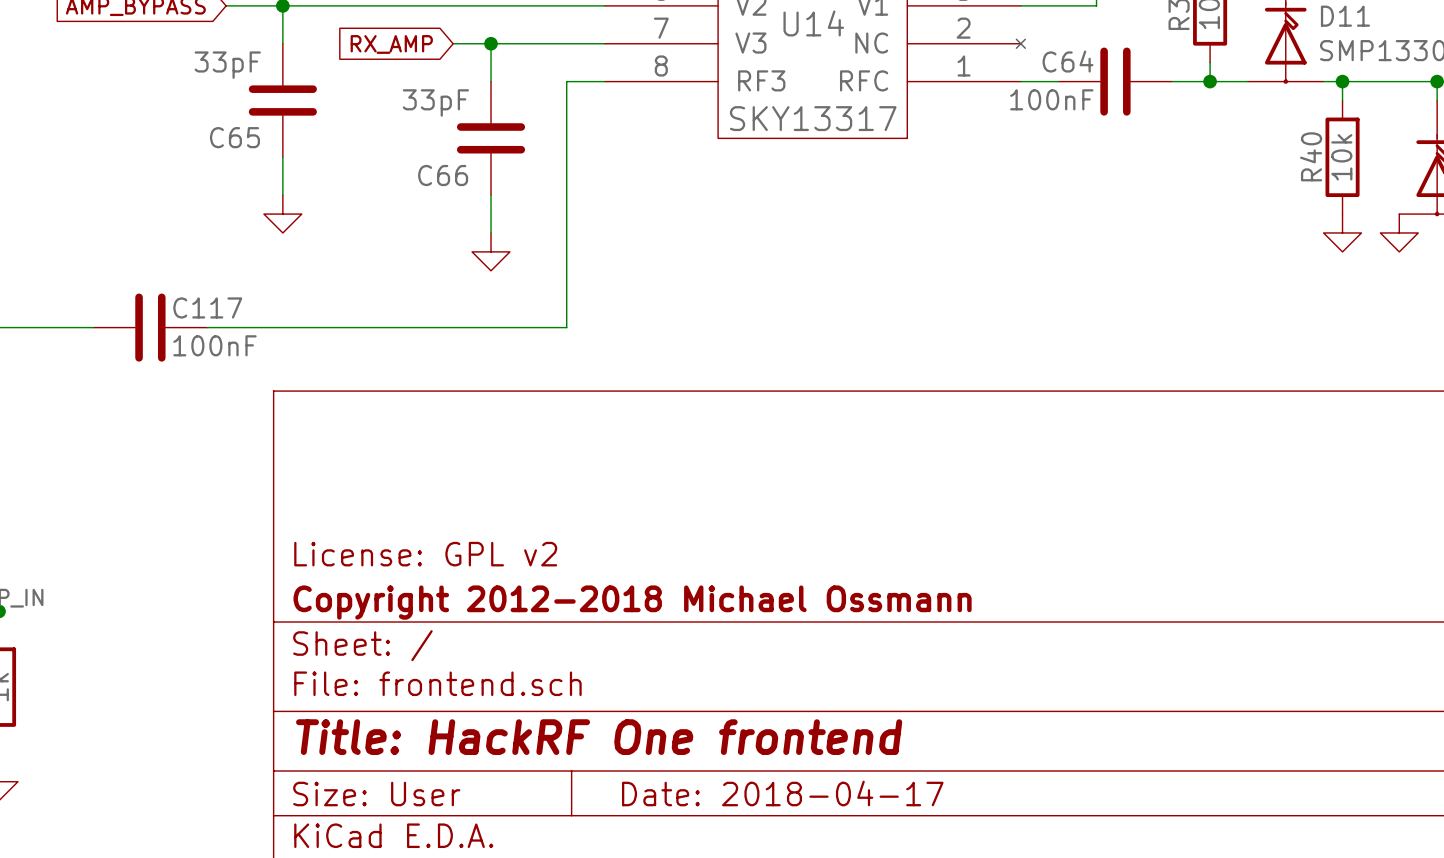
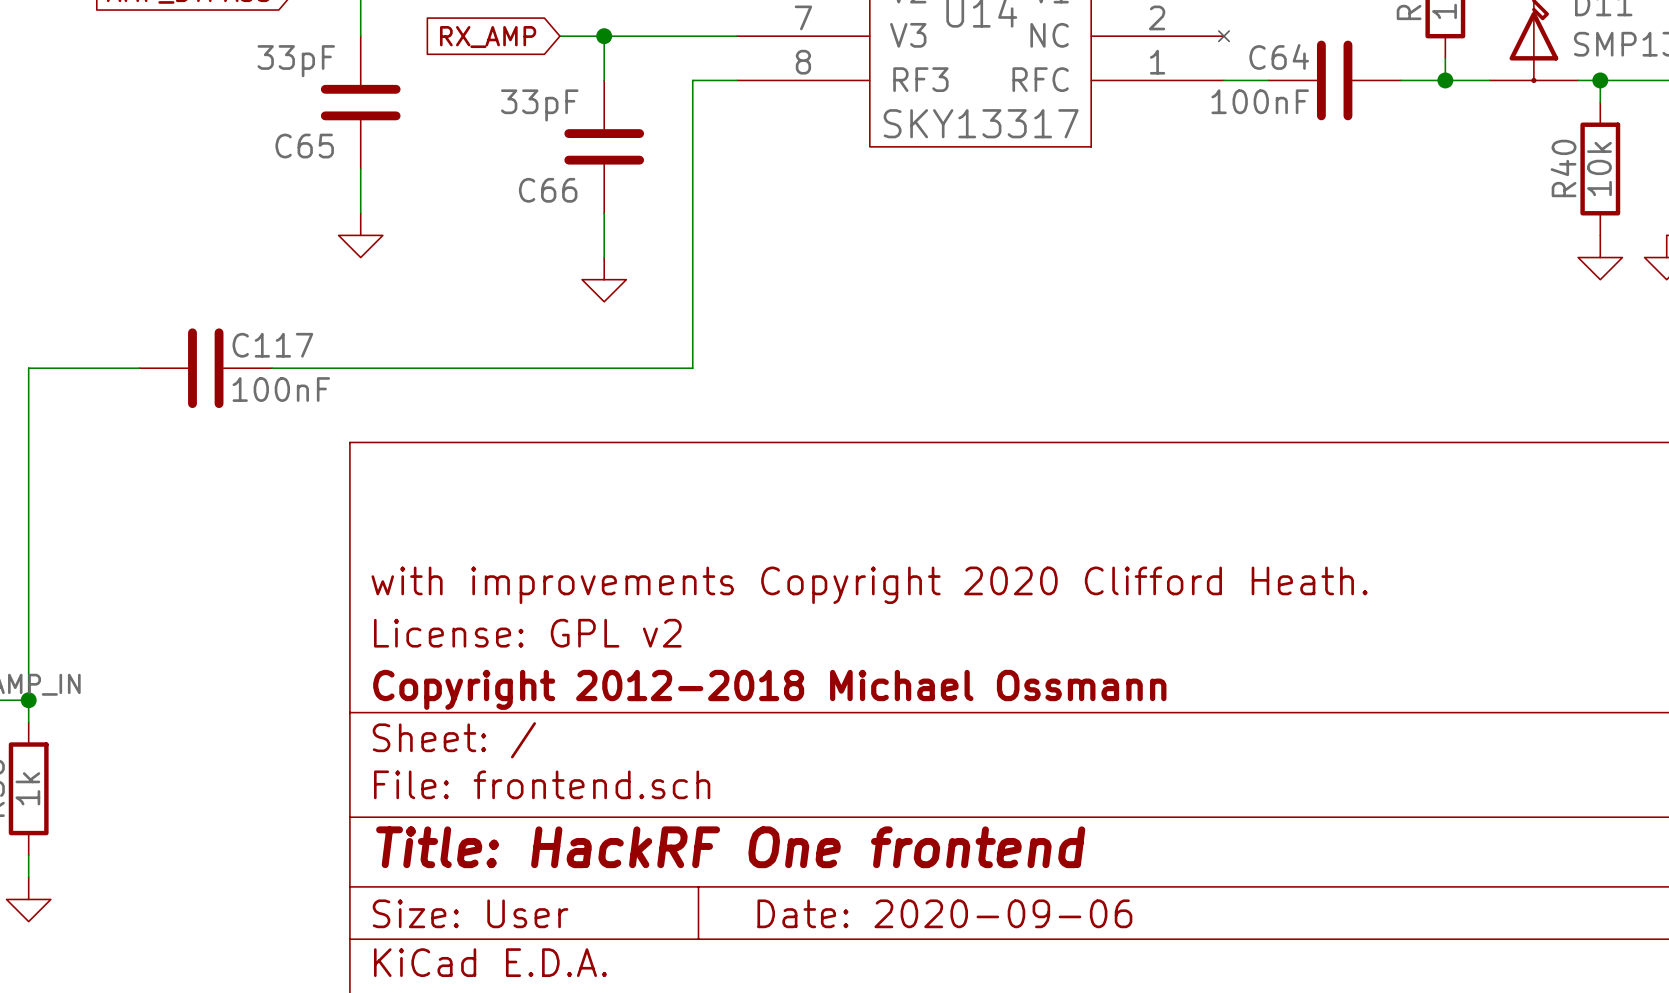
title block: none -> with improvements Copyright 2020 Clifford Heath. (869, 585)
title block: Date: 2018-04-17 (782, 793) -> Date: 2020-09-06 (944, 913)

